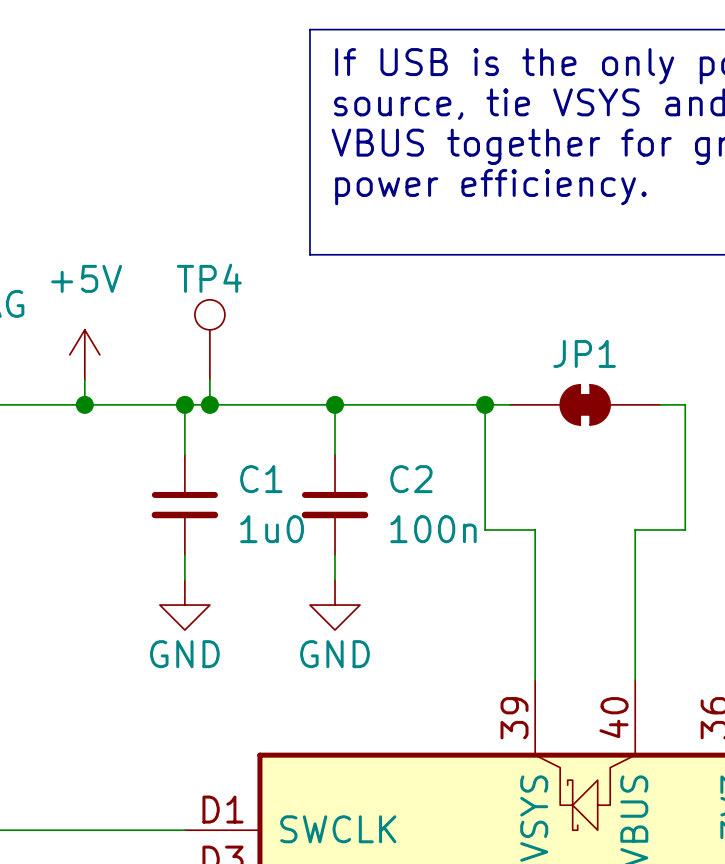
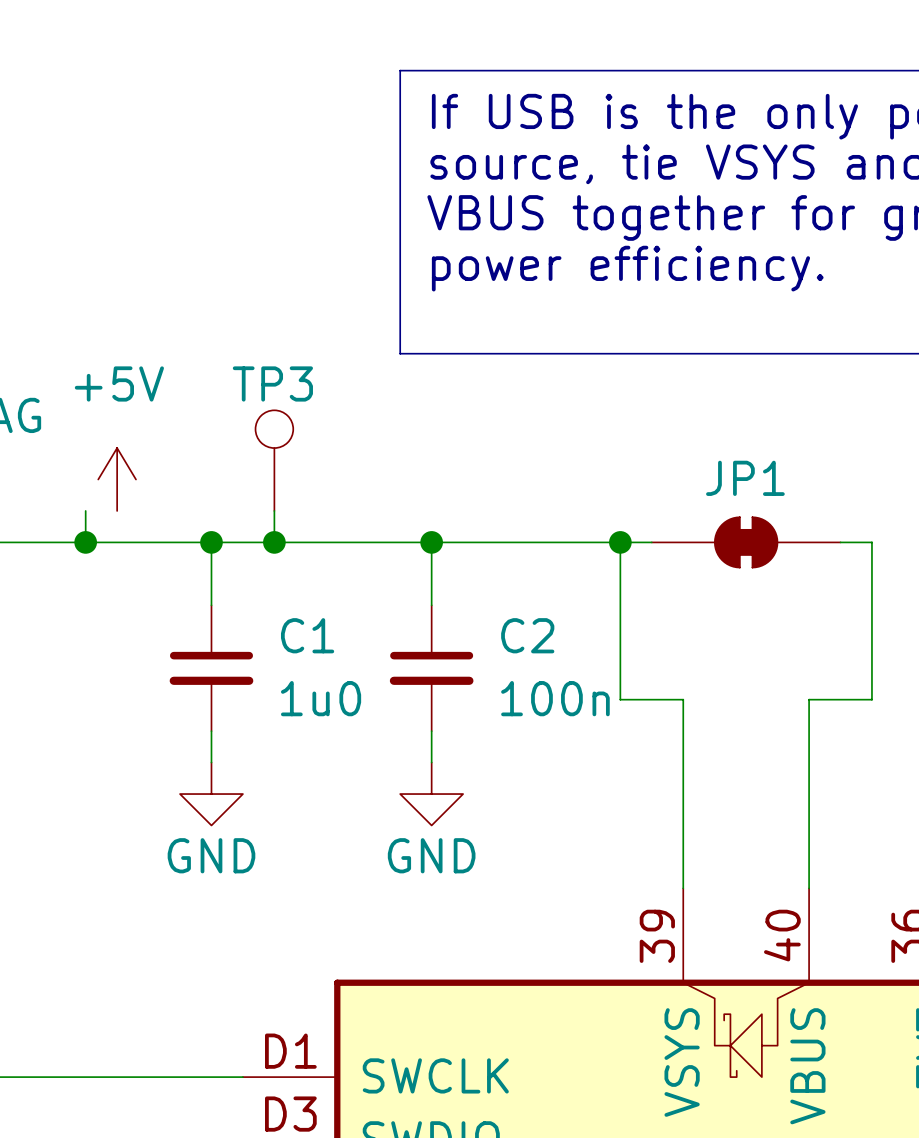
TP4 name: TP4 (209, 278) -> TP3 (272, 383)
wire: (84, 379) (84, 404) -> (85, 510) (85, 542)
junction position: (84, 404) -> (85, 542)
wire: (184, 404) (184, 454) -> (211, 542) (211, 605)
junction position: (184, 404) -> (211, 542)
C1 position: (184, 504) -> (211, 668)
wire: (184, 555) (184, 580) -> (211, 731) (211, 762)
power symbol position: GND (184, 605) -> GND (211, 794)

